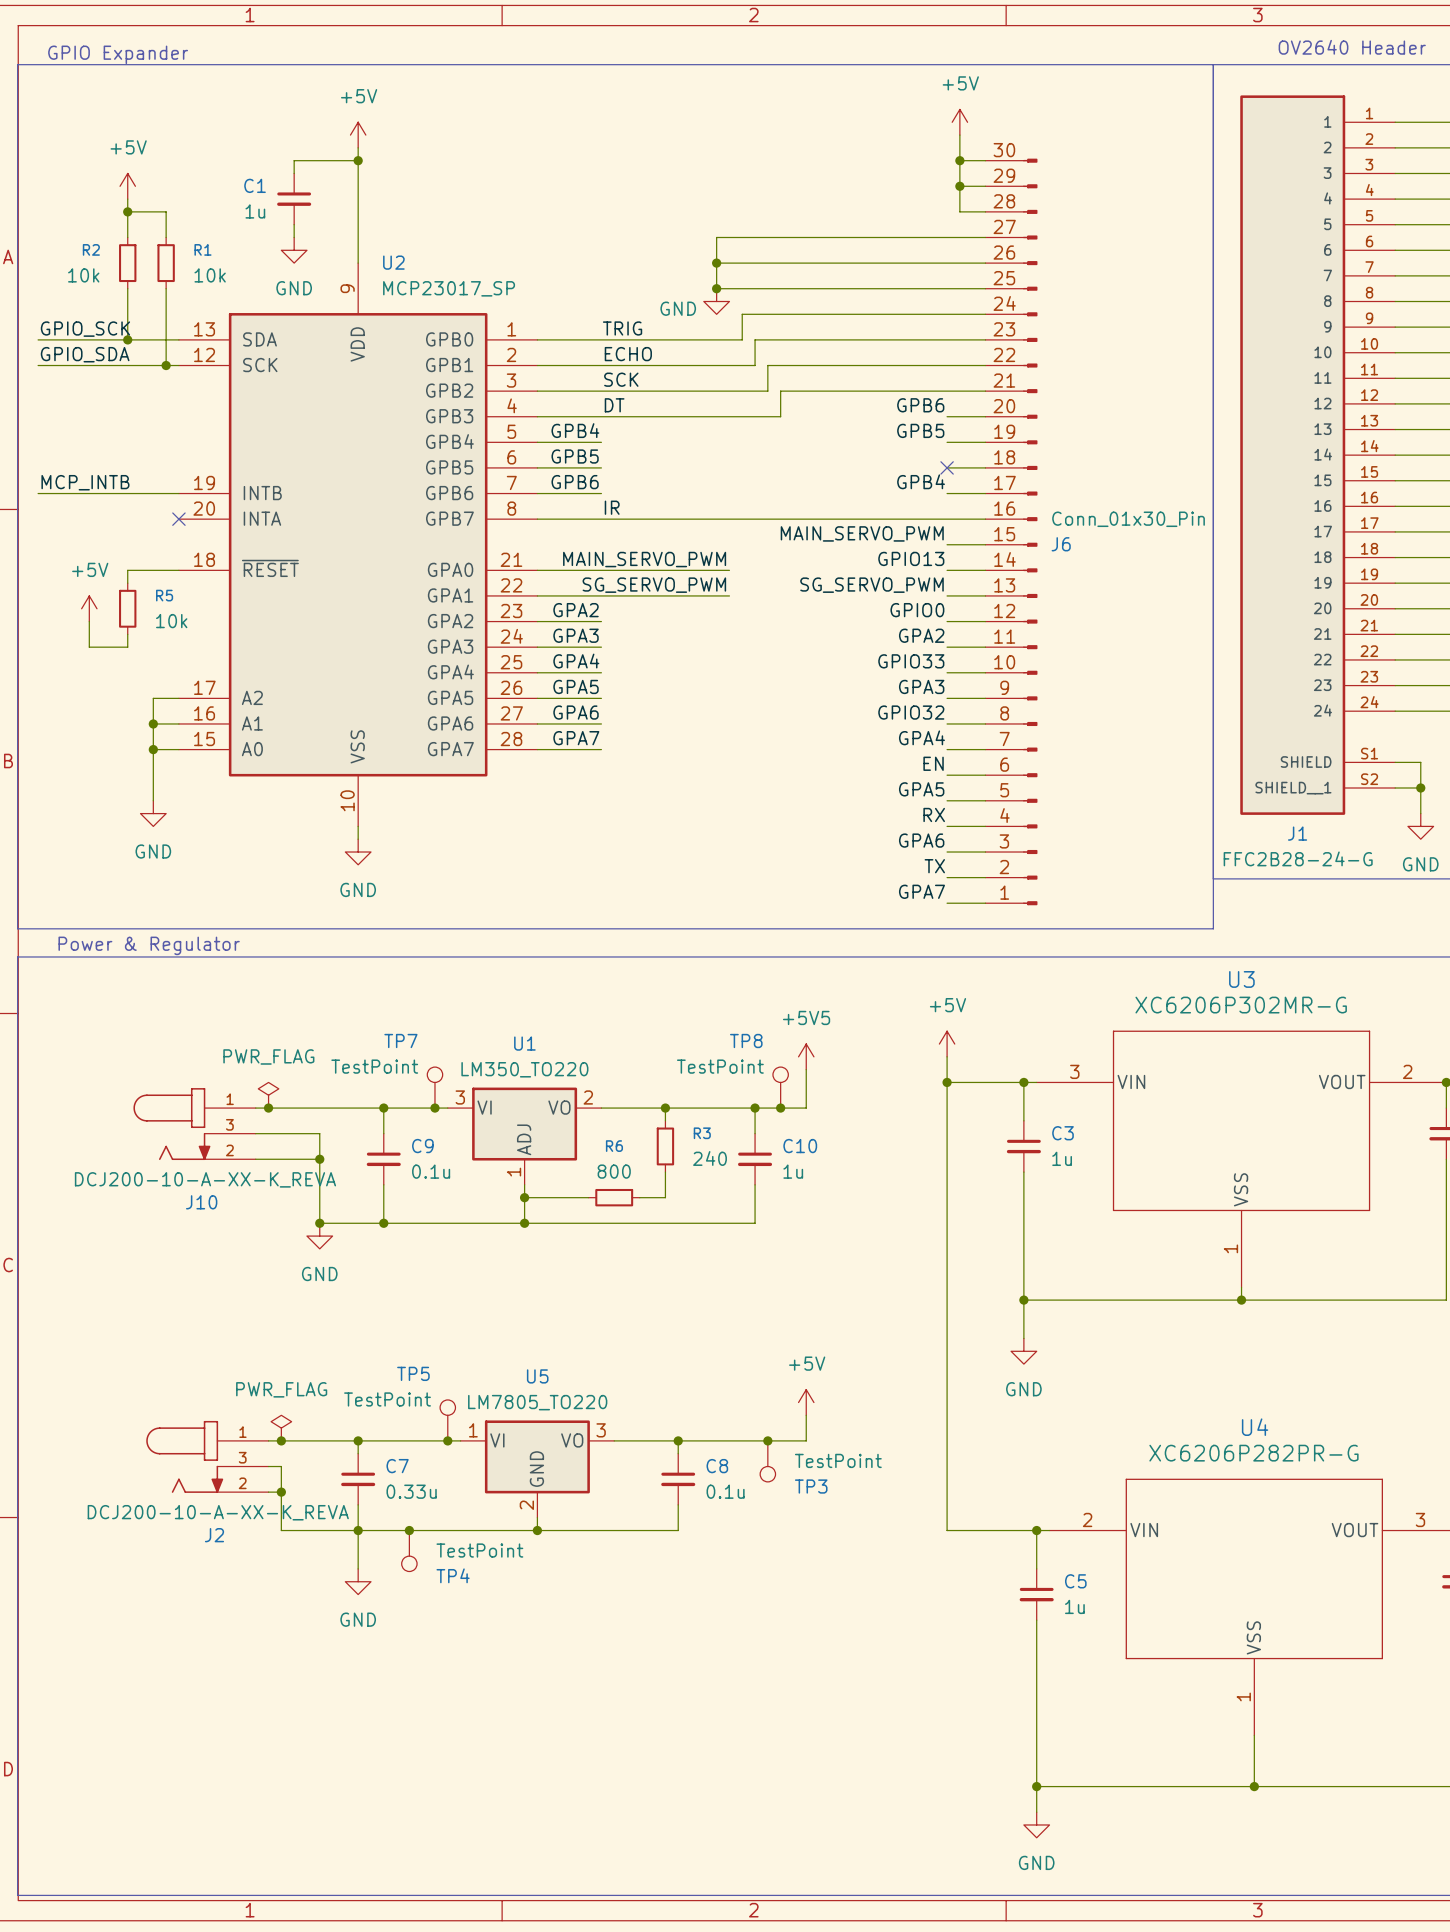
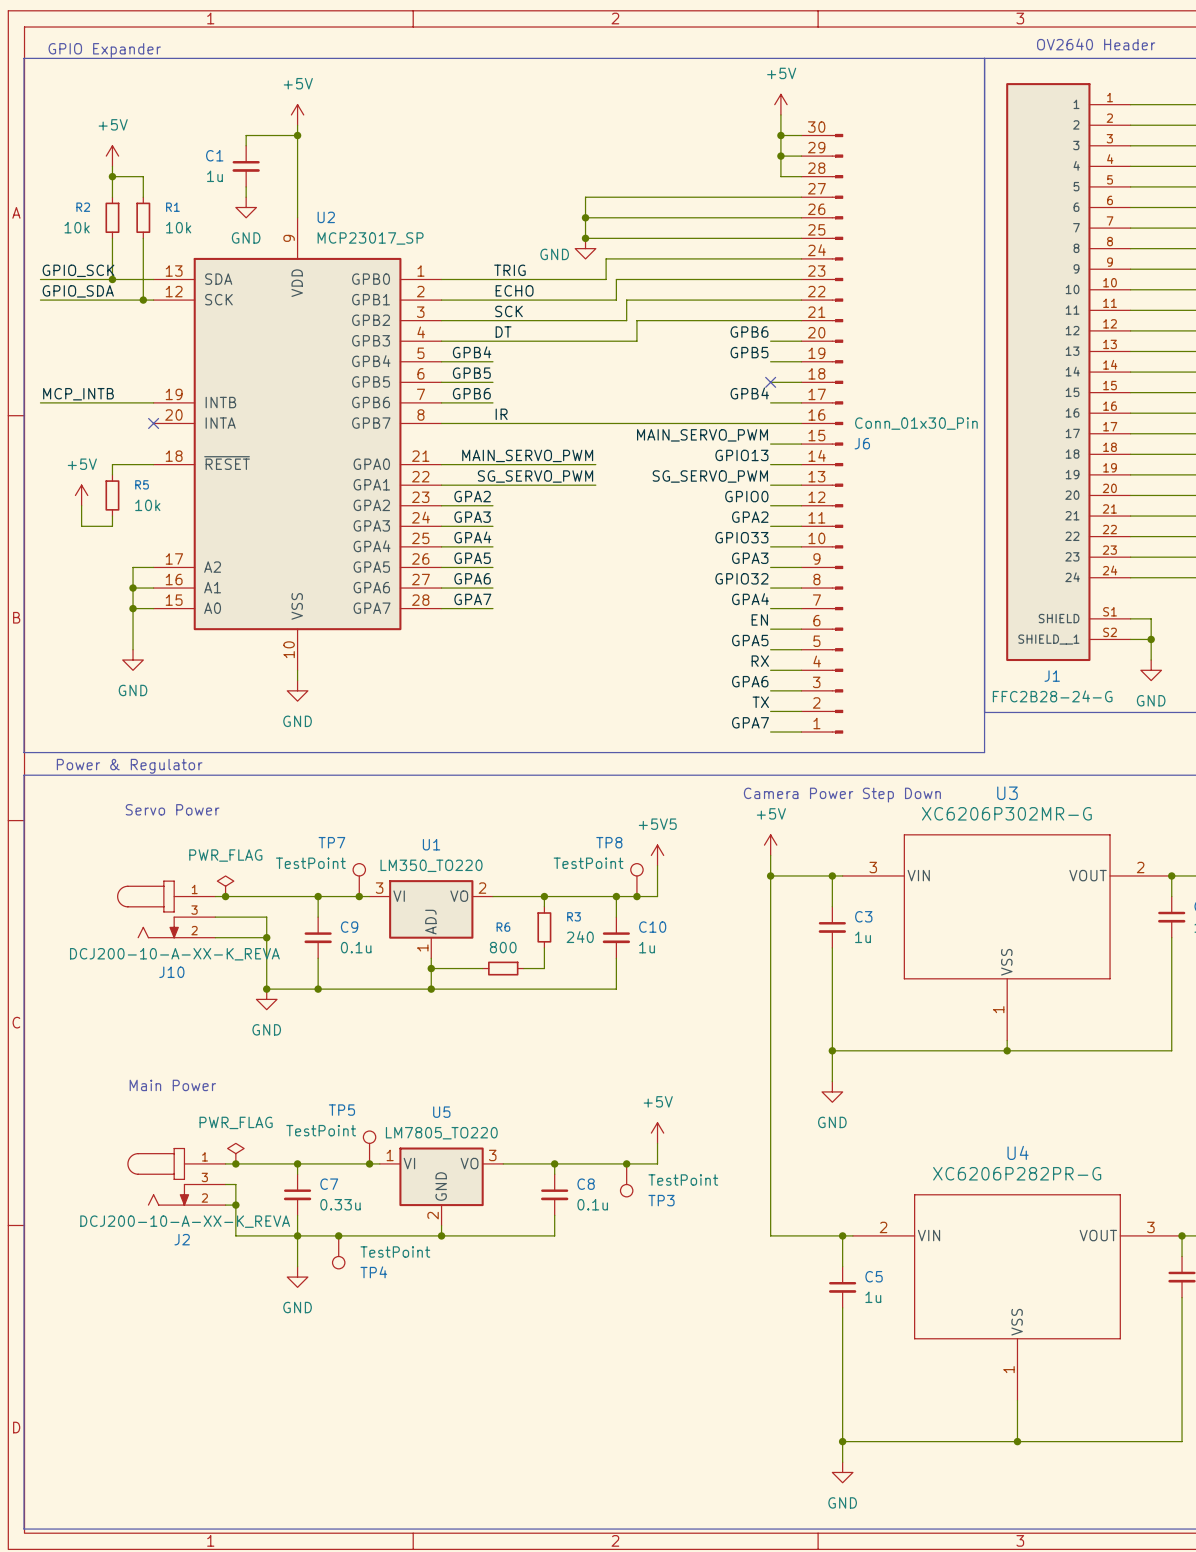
text: none -> Camera Power Step Down (842, 795)
text: none -> Servo Power (172, 809)
text: none -> Main Power (172, 1085)

